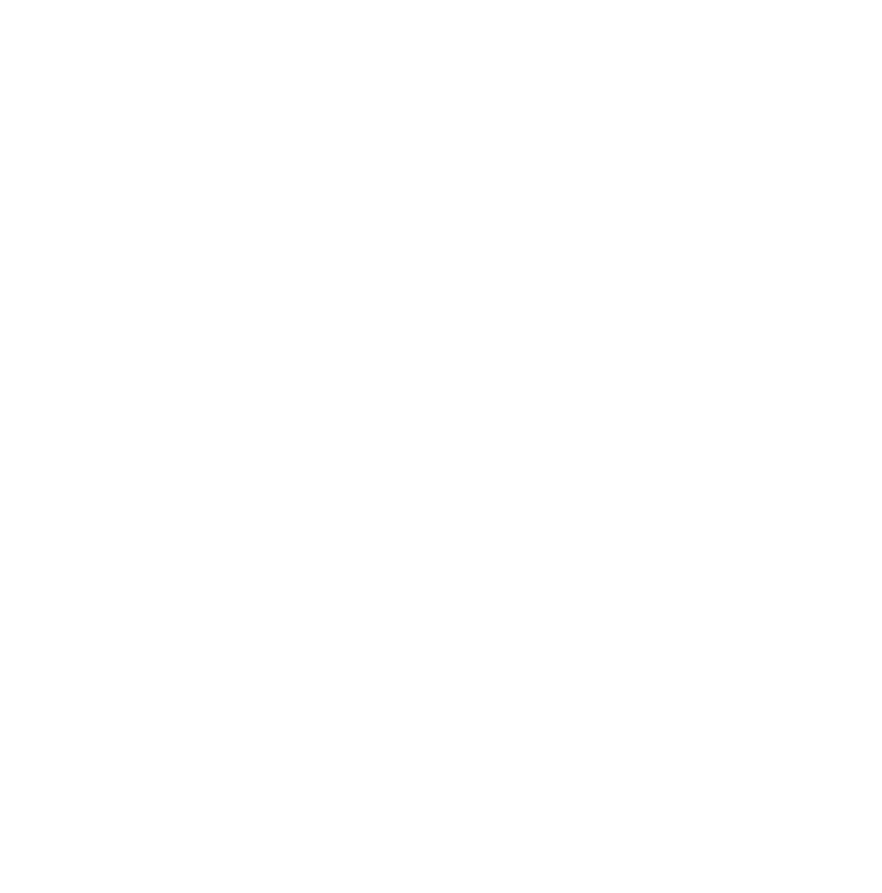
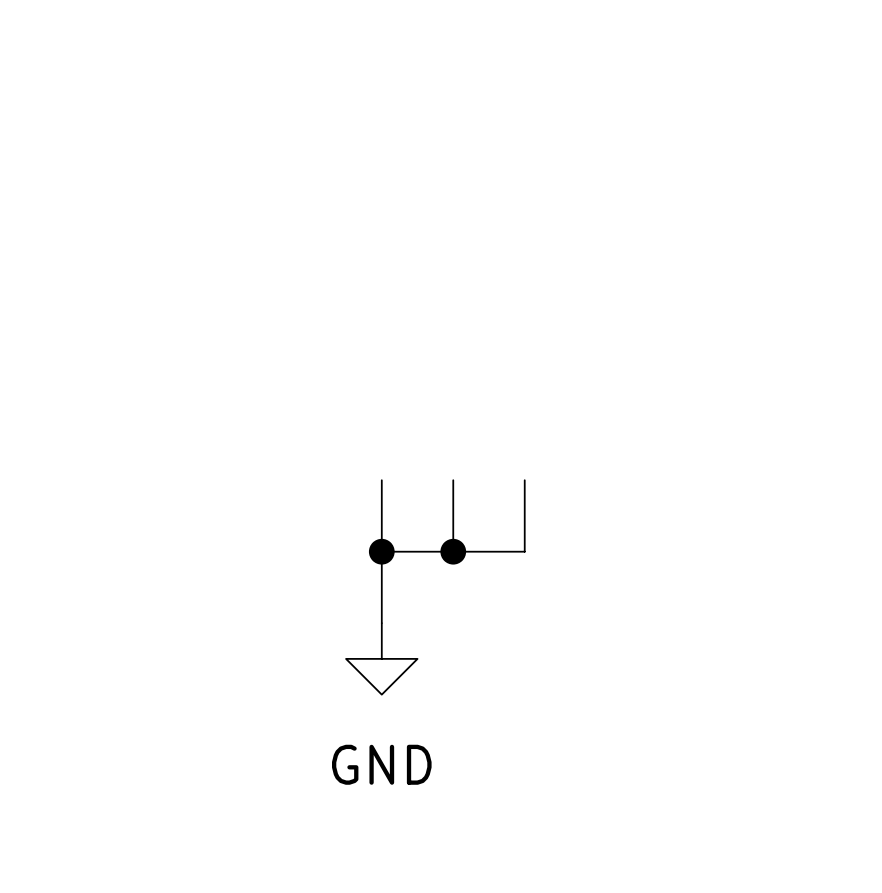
wire: none -> (381, 480) (381, 623)
wire: none -> (453, 480) (453, 551)
wire: none -> (524, 480) (524, 551) (381, 551)
junction: none -> (381, 551)
junction: none -> (453, 551)
power symbol: none -> GND (381, 658)

